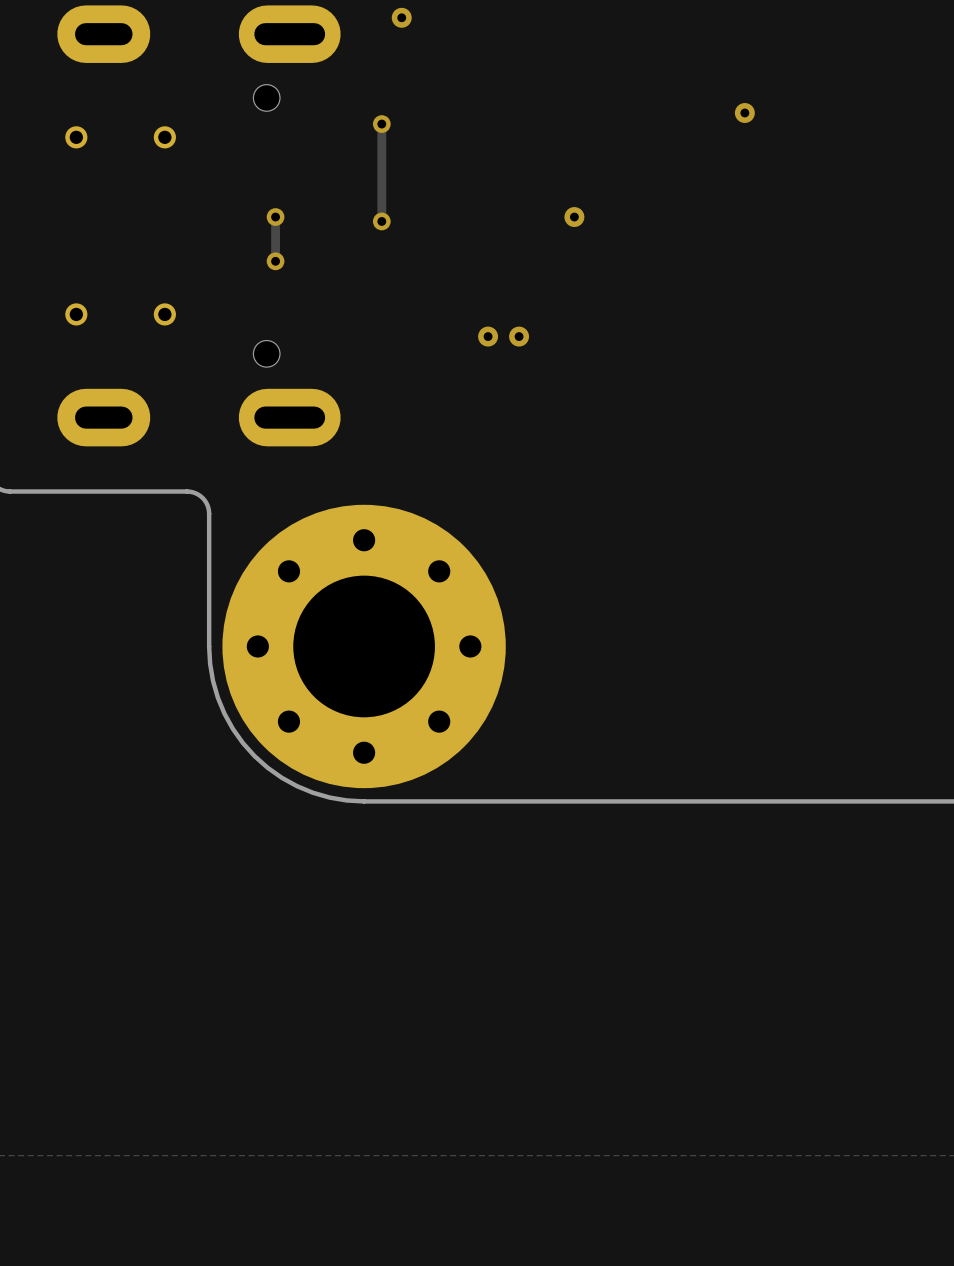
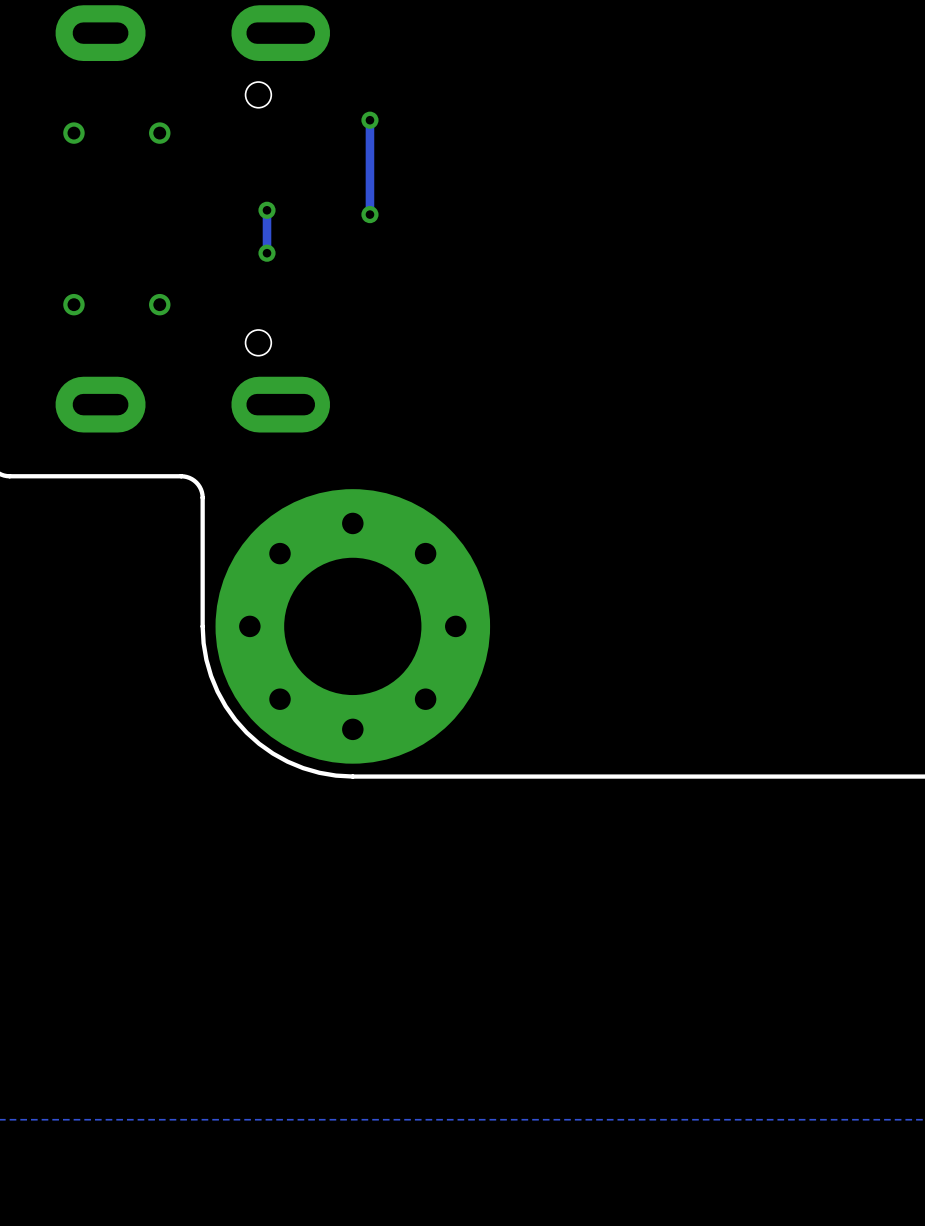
via: (401, 17) -> none
via: (744, 112) -> none
via: (574, 217) -> none
via: (488, 336) -> none
via: (519, 336) -> none

